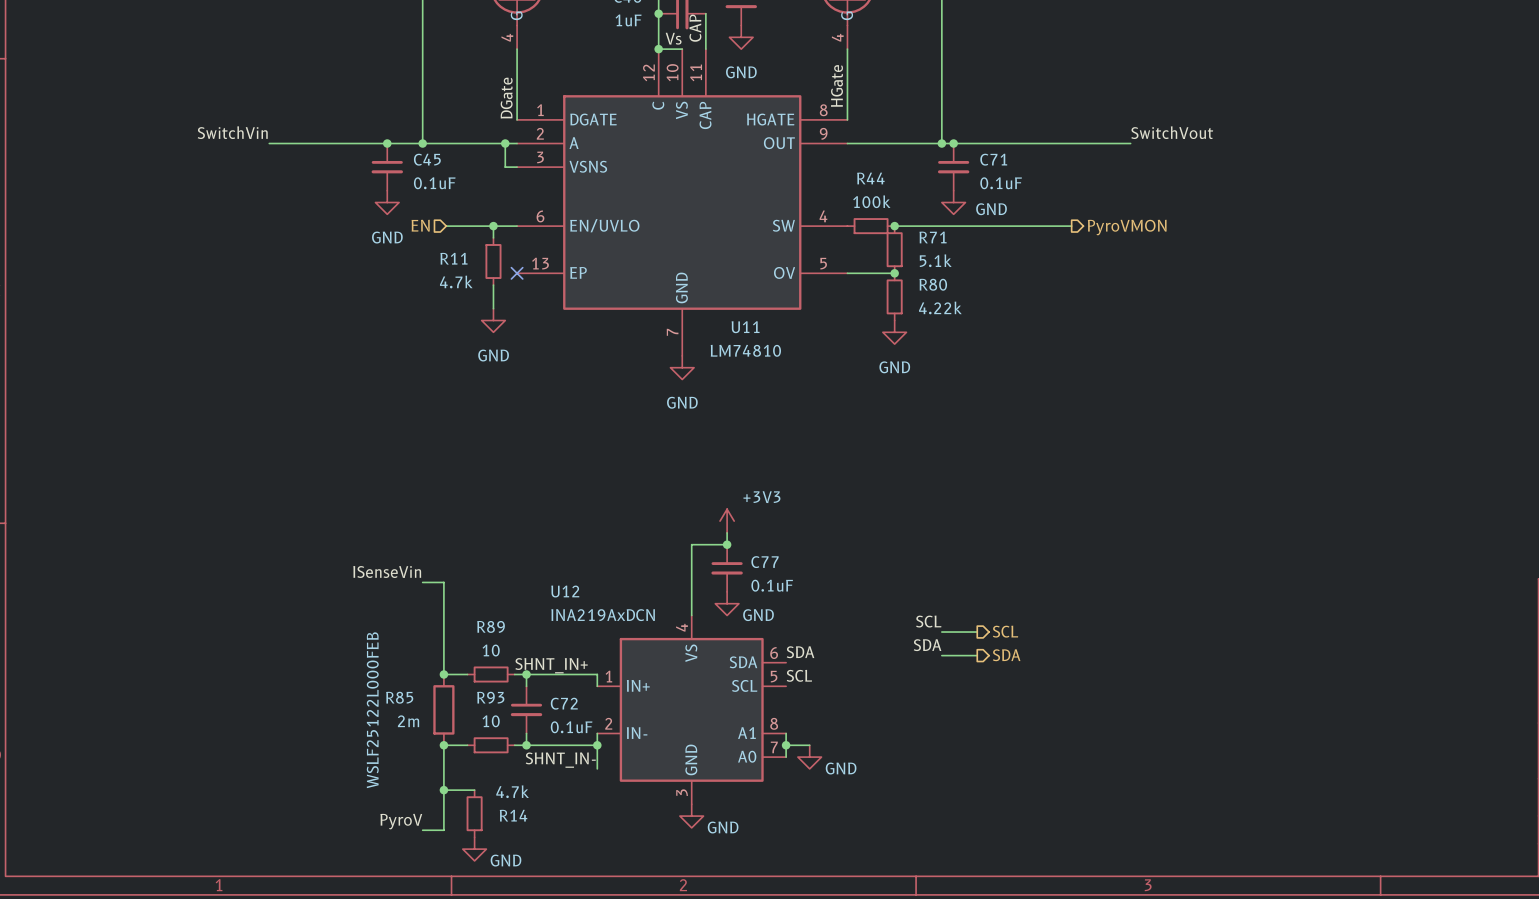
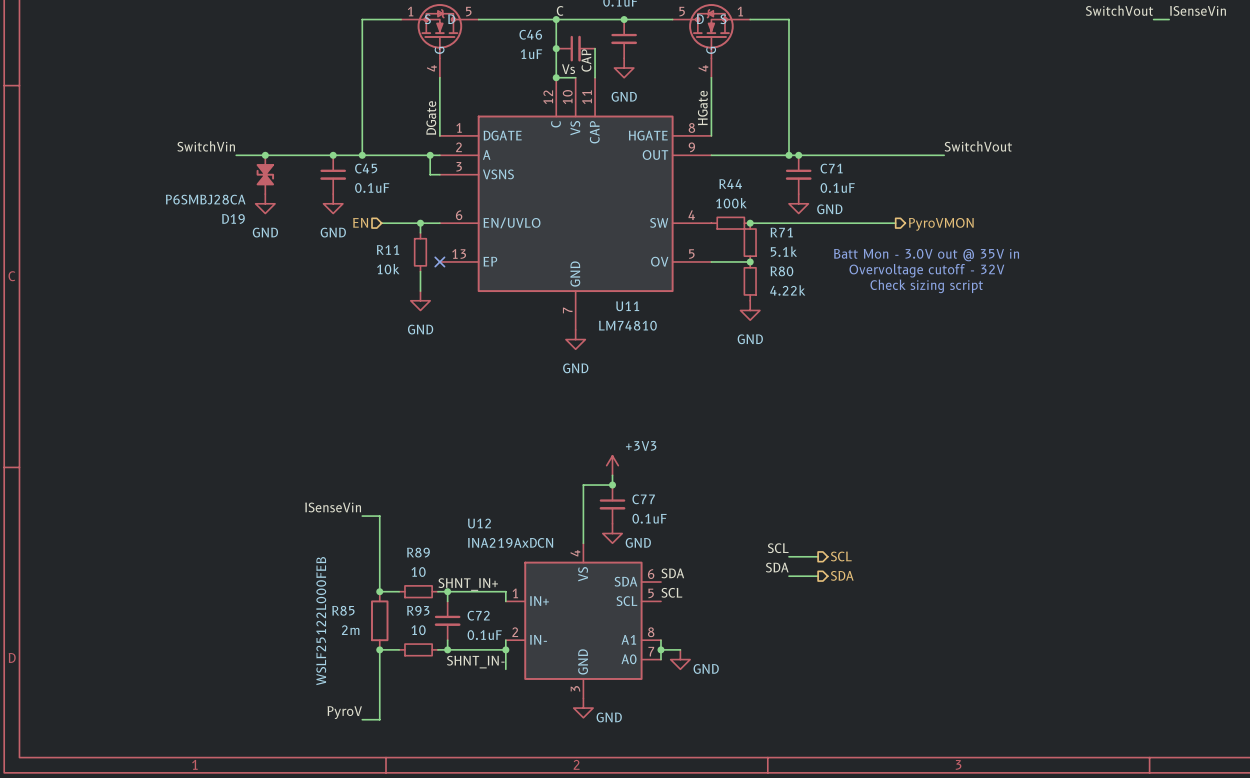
junction: none -> (265, 155)
D19: none -> P6SMBJ28CA (265, 174)
power symbol: none -> GND (265, 203)
text: none -> Batt Mon - 3.0V out @ 35V in (926, 255)
R11 value: 4.7k (456, 281) -> 10k (388, 269)
text: none -> Overvoltage cutoff - 32V (926, 270)
text: none -> Check sizing script (926, 286)
wire: (443, 790) (474, 790) -> none
junction: (443, 790) -> none
R14: 4.7k (474, 813) -> none
power symbol: GND (474, 849) -> none

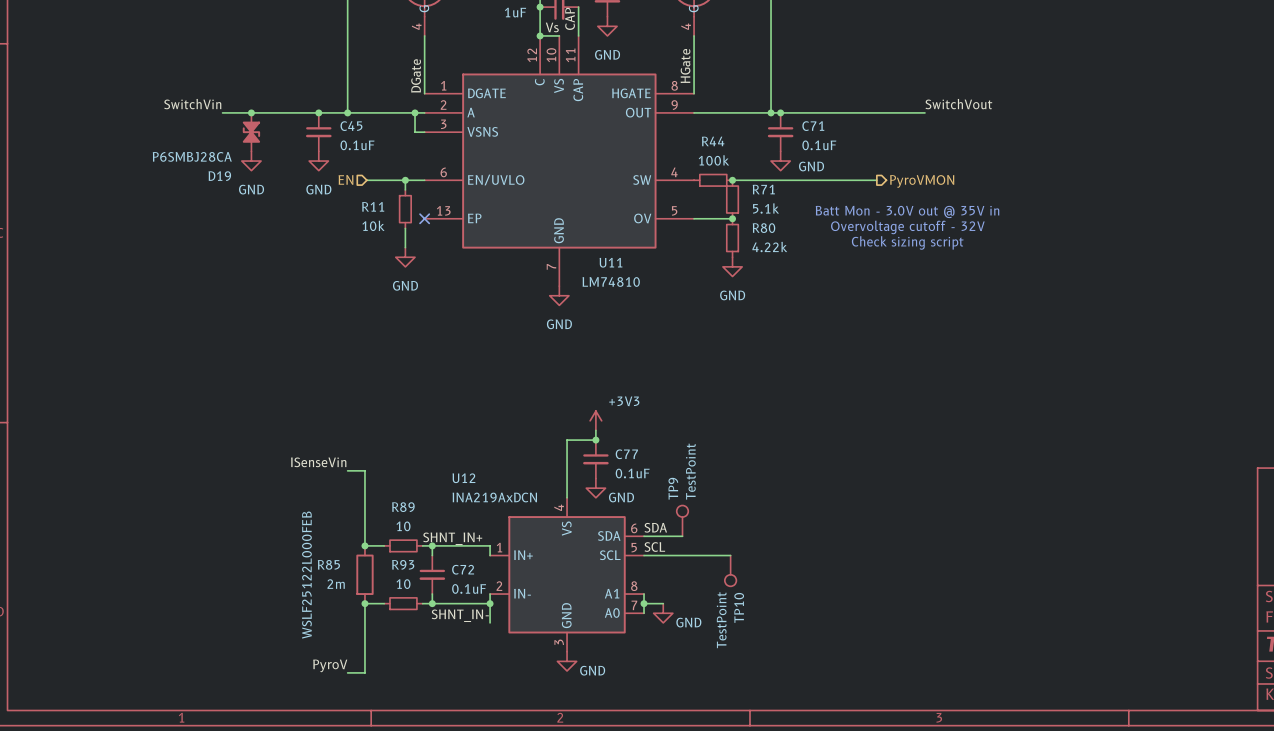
label: SCL (778, 548) -> none
wire: (788, 556) (818, 556) -> none
hierarchical label: SCL (841, 556) -> none
TP9: none -> TestPoint (682, 520)
label: SDA (777, 567) -> none
hierarchical label: SDA (842, 575) -> none
wire: (788, 576) (818, 576) -> none
wire: none -> (644, 536) (682, 536)
wire: none -> (644, 555) (730, 555)
TP10: none -> TestPoint (730, 570)

